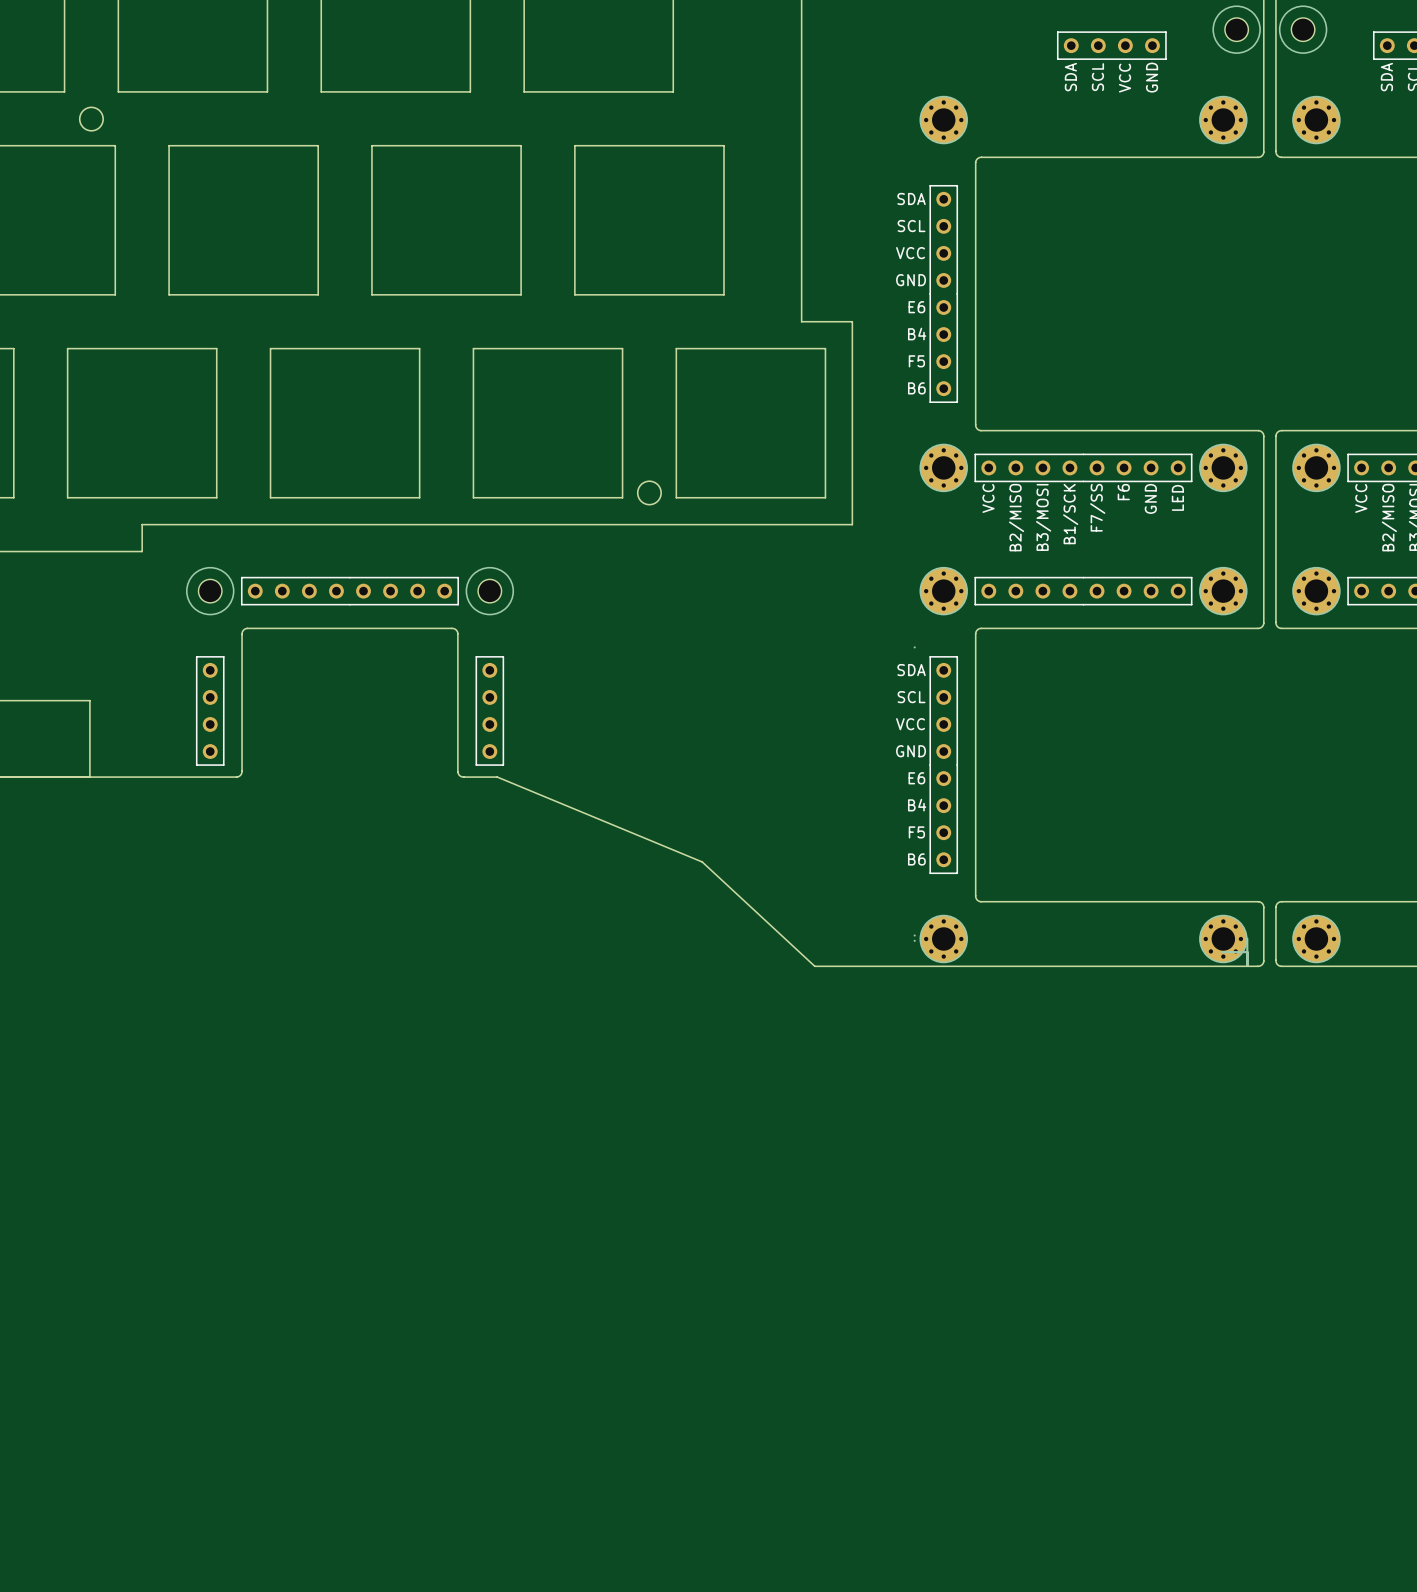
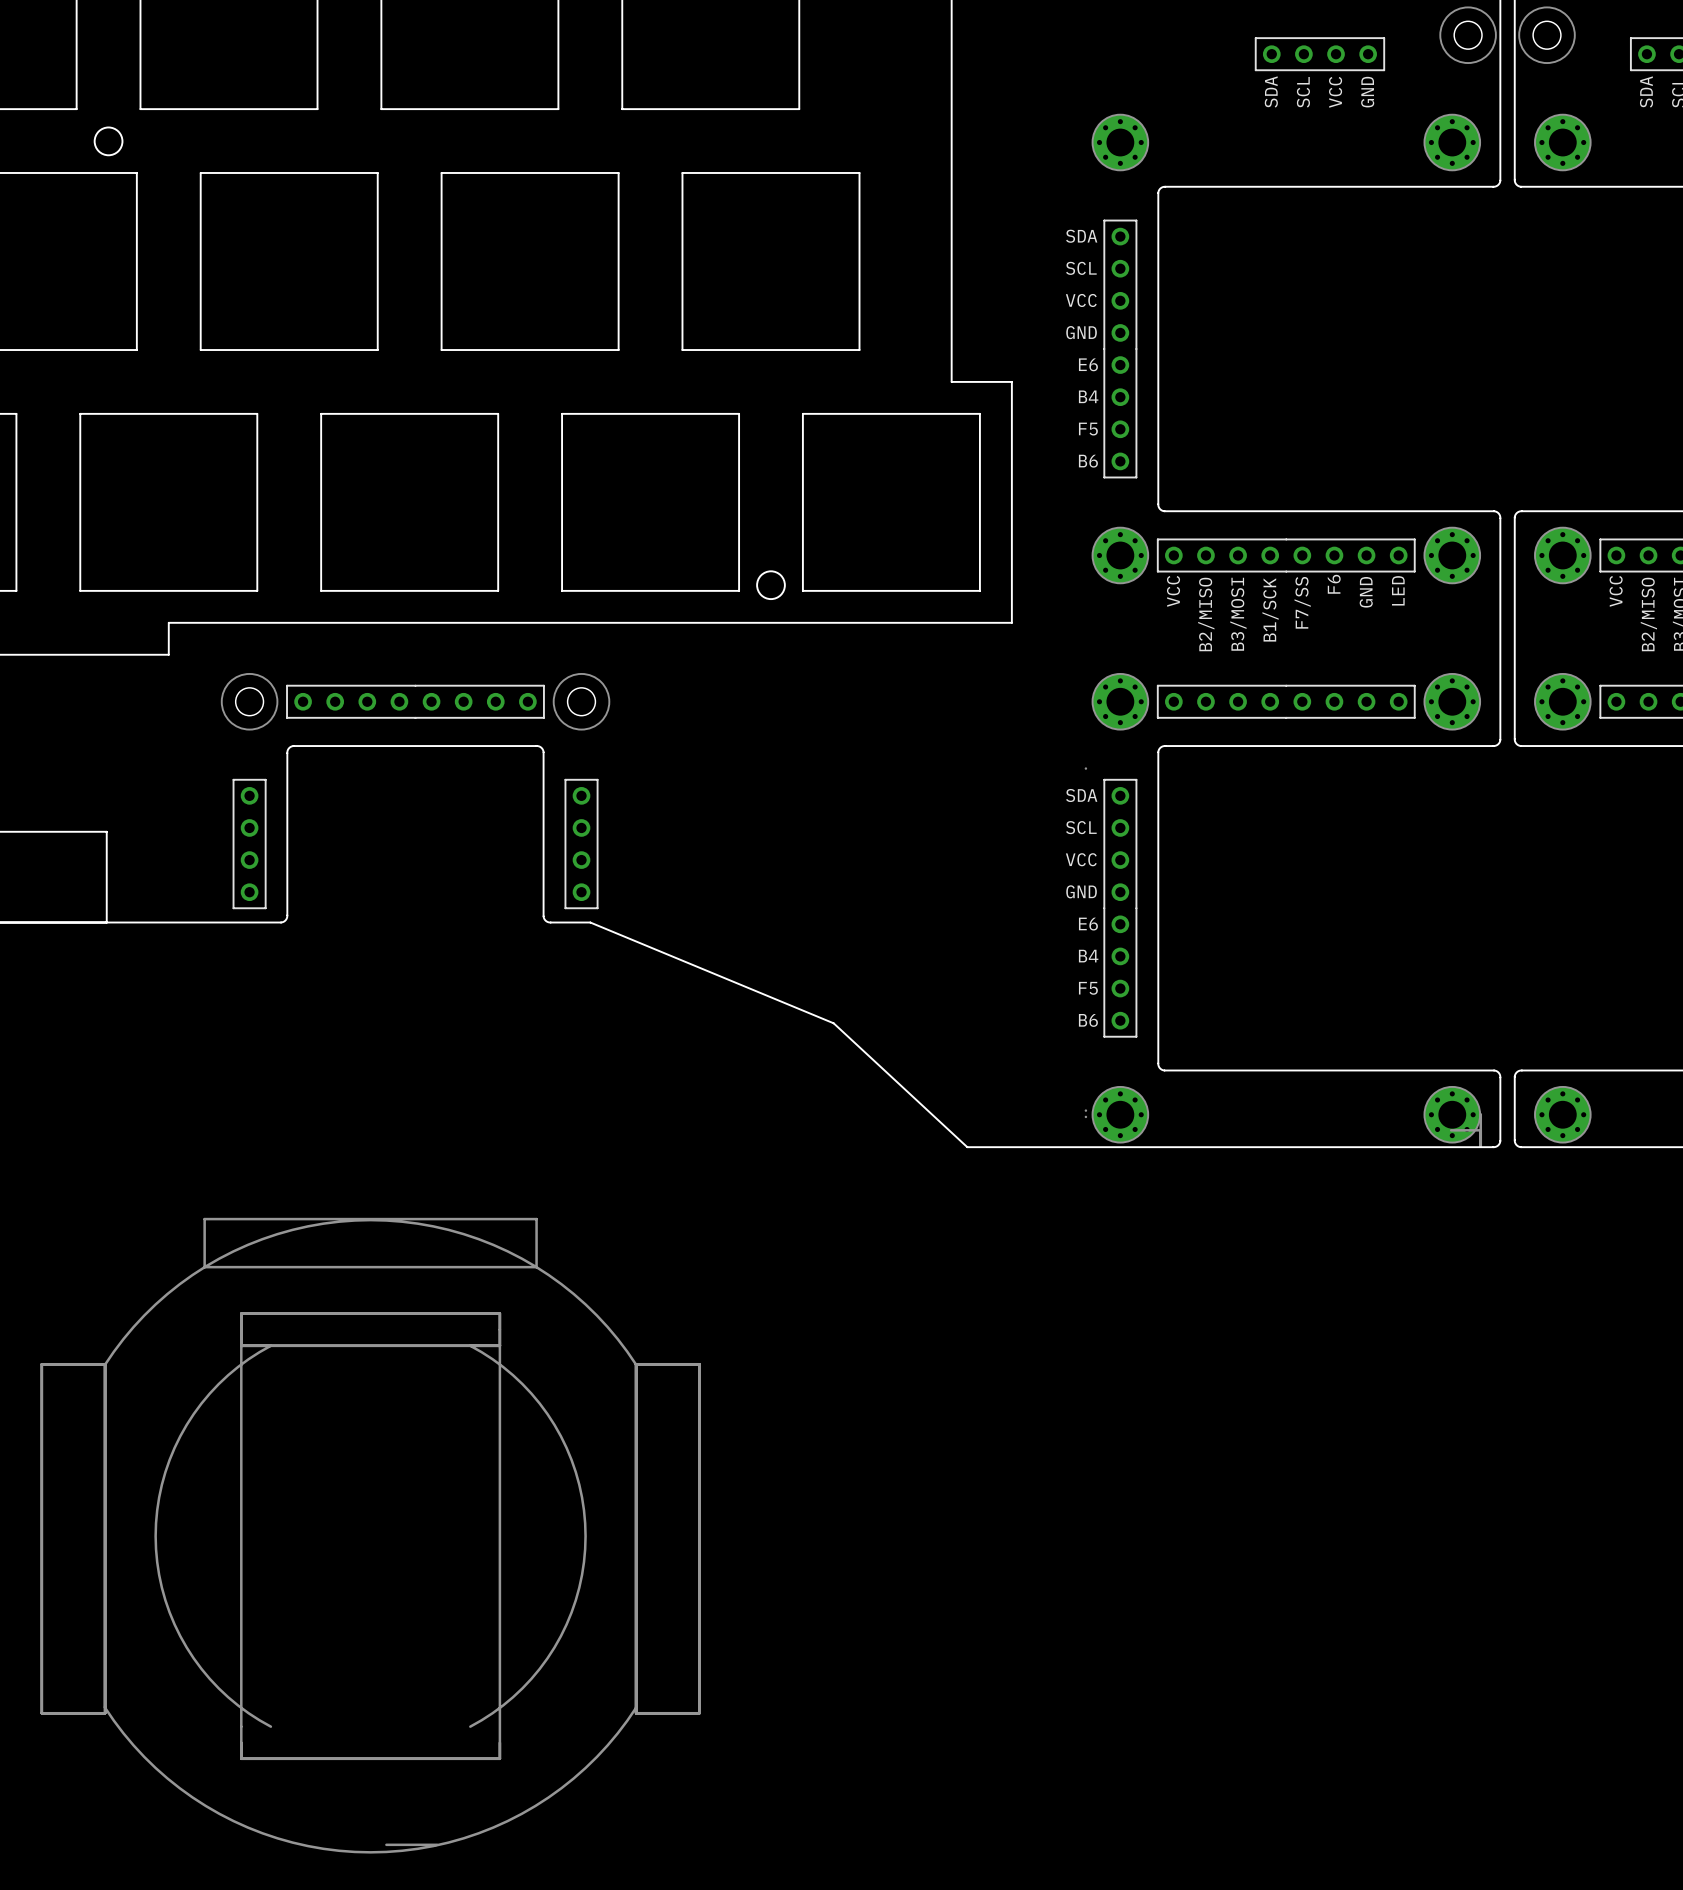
line: none -> (204, 1219) (536, 1219) (536, 1267) (204, 1267) (204, 1219)
line: none -> (241, 1345) (499, 1345)
line: none -> (241, 1345) (241, 1313) (499, 1313) (499, 1345)
line: none -> (241, 1345) (241, 1758) (499, 1758)
line: none -> (270, 1345) (238, 1366) (218, 1384) (201, 1403) (186, 1424) (174, 1447) (161, 1484) (157, 1510) (155, 1536) (157, 1562) (161, 1587) (174, 1624) (186, 1647) (209, 1678) (228, 1697) (248, 1713) (270, 1726)
line: none -> (470, 1345) (492, 1359) (513, 1375) (539, 1403) (554, 1424) (566, 1447) (575, 1472) (582, 1497) (585, 1536) (583, 1562) (575, 1600) (566, 1624) (554, 1647) (539, 1668) (522, 1688) (492, 1713) (470, 1726)
line: none -> (499, 1345) (499, 1758)
line: none -> (41, 1364) (41, 1713) (105, 1713) (105, 1364) (41, 1364)
line: none -> (105, 1364) (133, 1327) (155, 1304) (192, 1275) (219, 1258) (262, 1239) (292, 1229) (323, 1223) (370, 1220) (417, 1223) (448, 1229) (493, 1244) (521, 1258) (548, 1275) (585, 1304) (617, 1339) (636, 1364)
line: none -> (636, 1364) (699, 1364) (699, 1713) (636, 1713) (636, 1364)
line: none -> (105, 1707) (123, 1733) (155, 1767) (192, 1797) (219, 1813) (247, 1827) (292, 1842) (323, 1848) (370, 1852) (402, 1850) (448, 1842) (493, 1827) (521, 1813) (548, 1797) (585, 1767) (607, 1745) (636, 1707)
line: none -> (386, 1844) (436, 1844)

